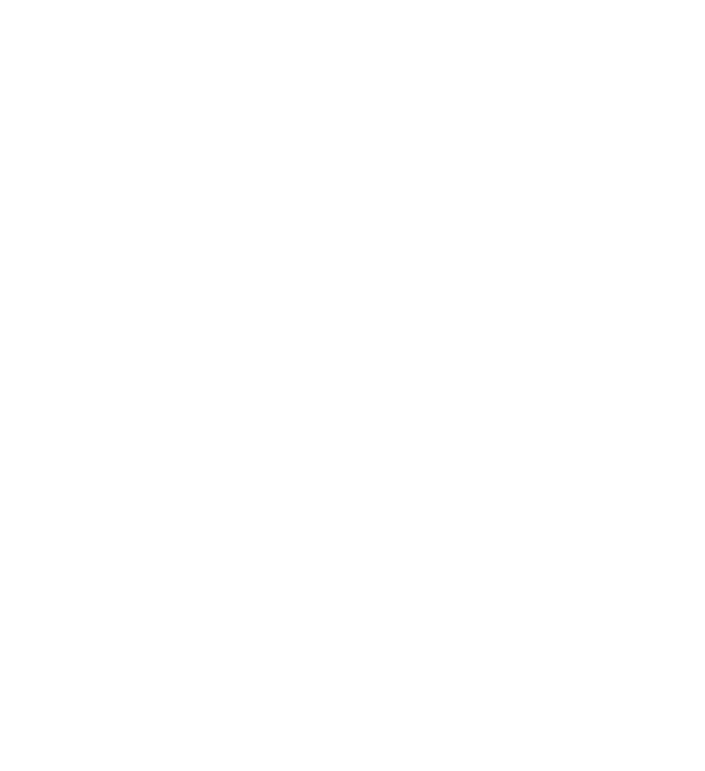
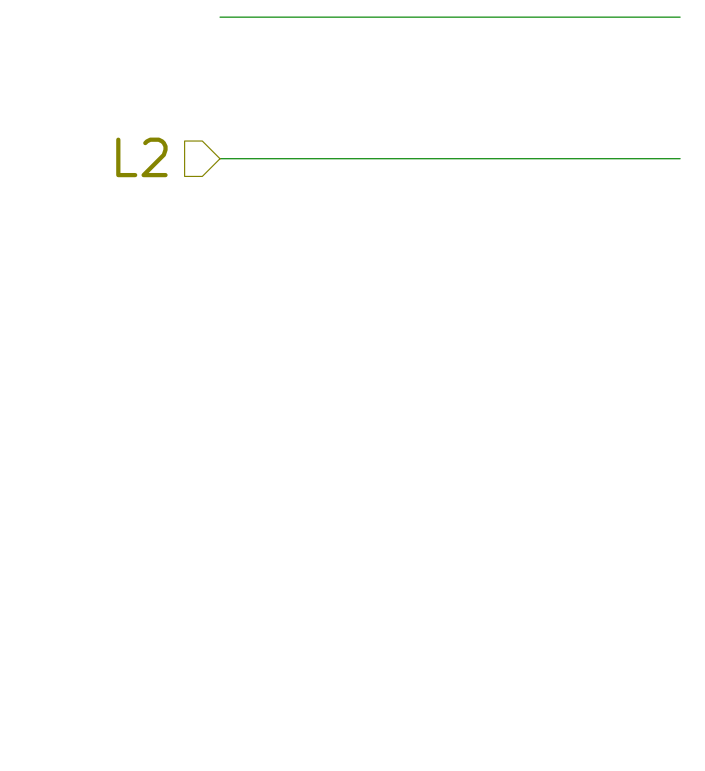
wire: none -> (220, 17) (680, 17)
hierarchical label: none -> L2 (141, 157)
wire: none -> (220, 158) (680, 158)

